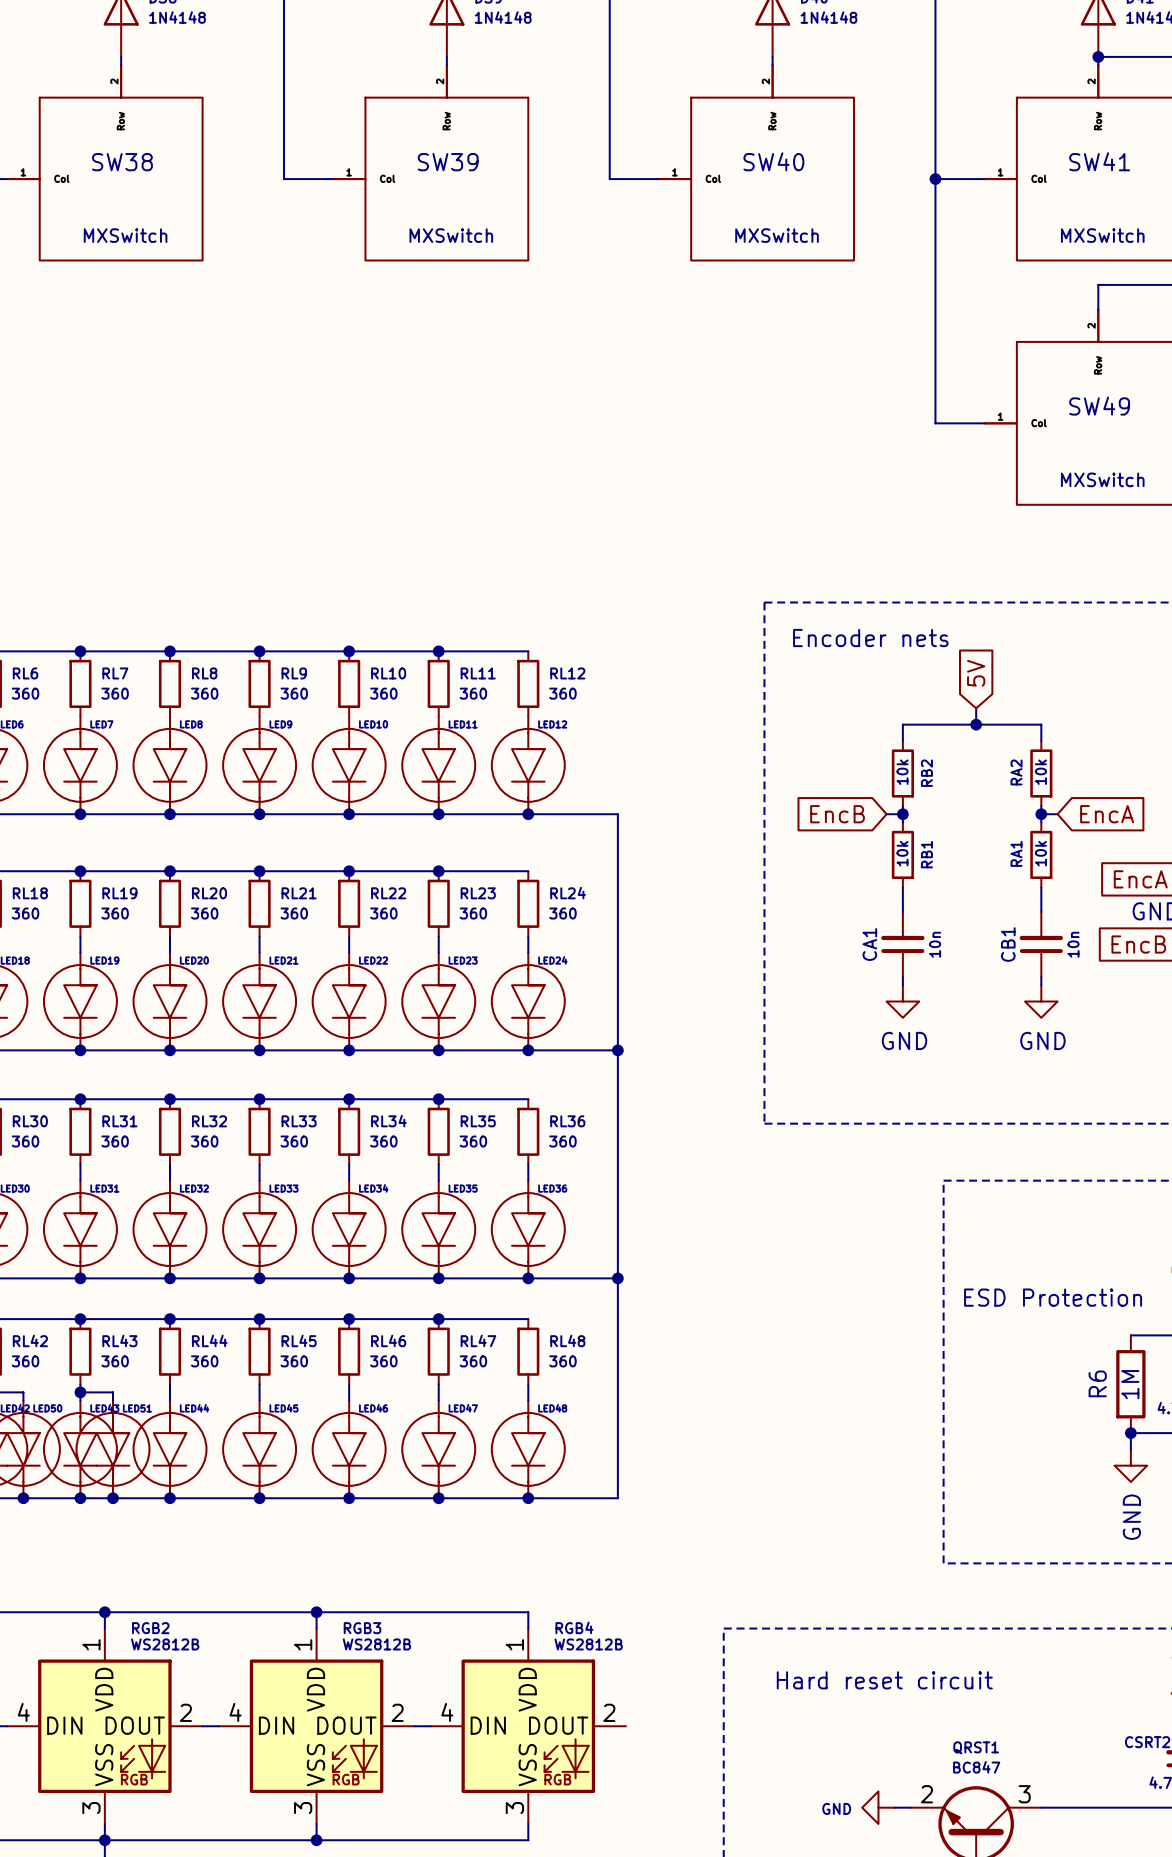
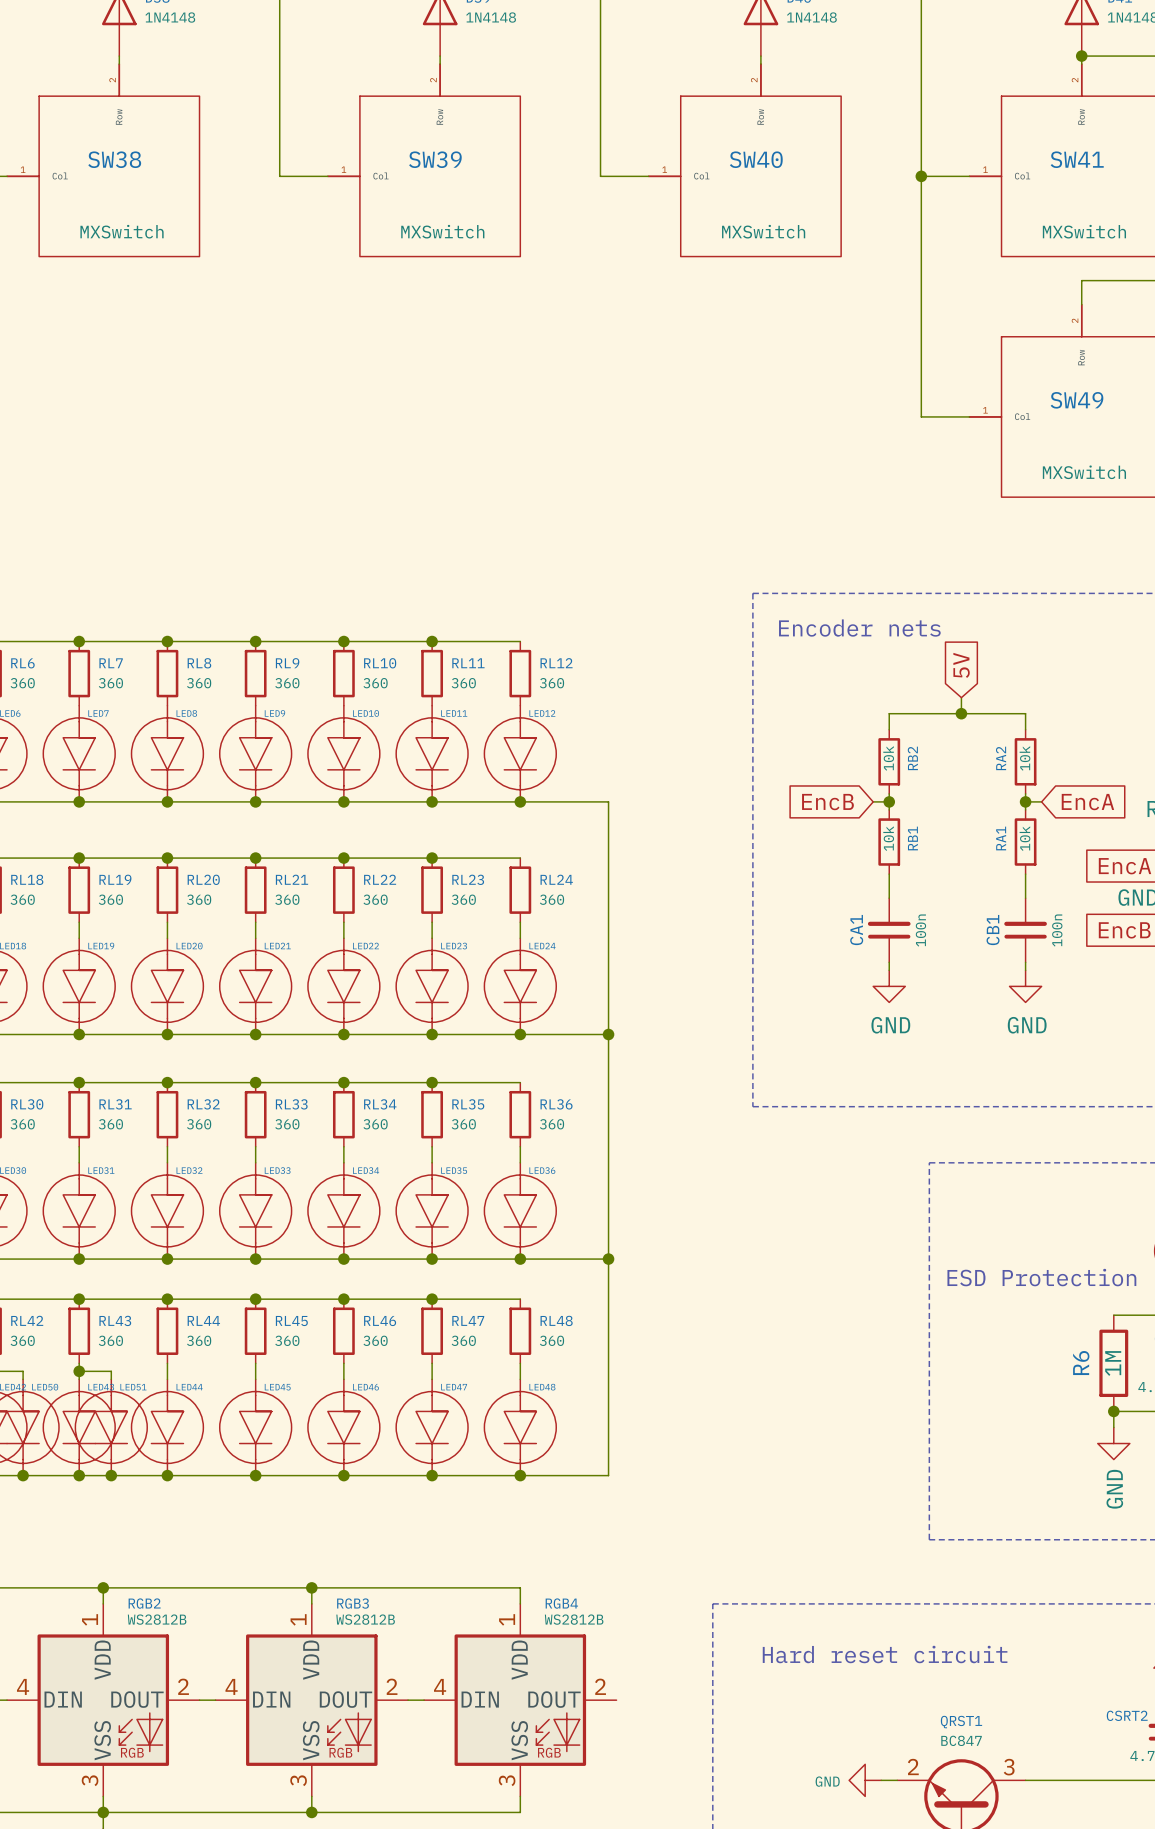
CA1 value: 10n (935, 944) -> 100n (920, 930)
CB1 value: 10n (1073, 944) -> 100n (1057, 930)

